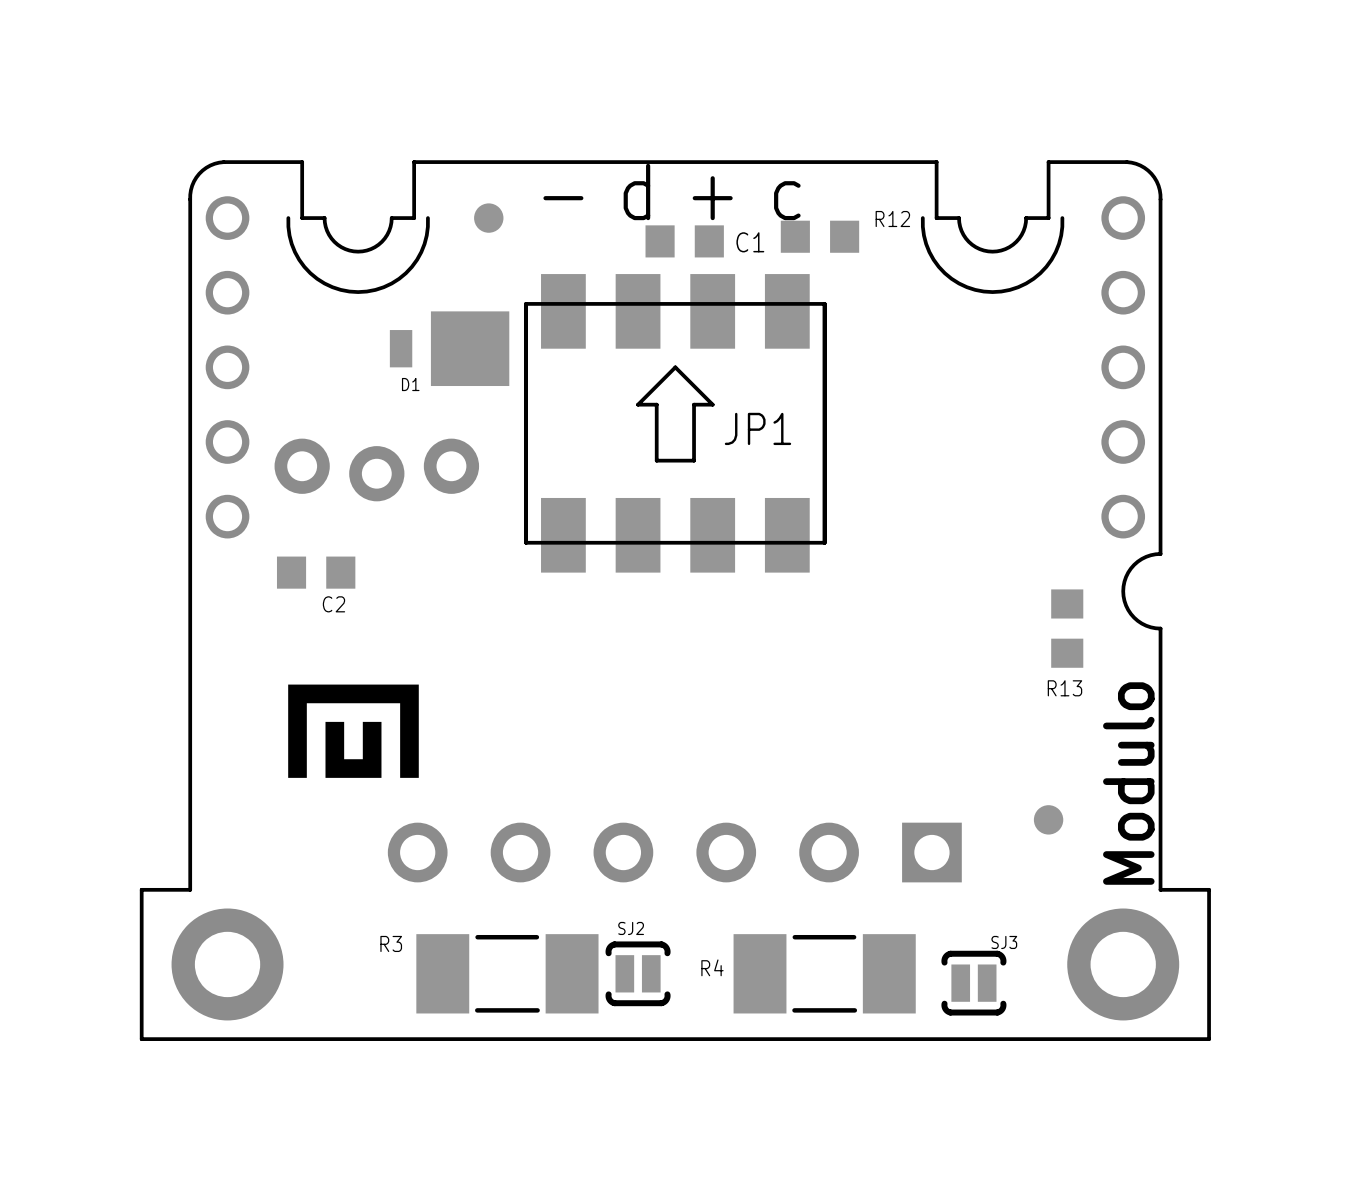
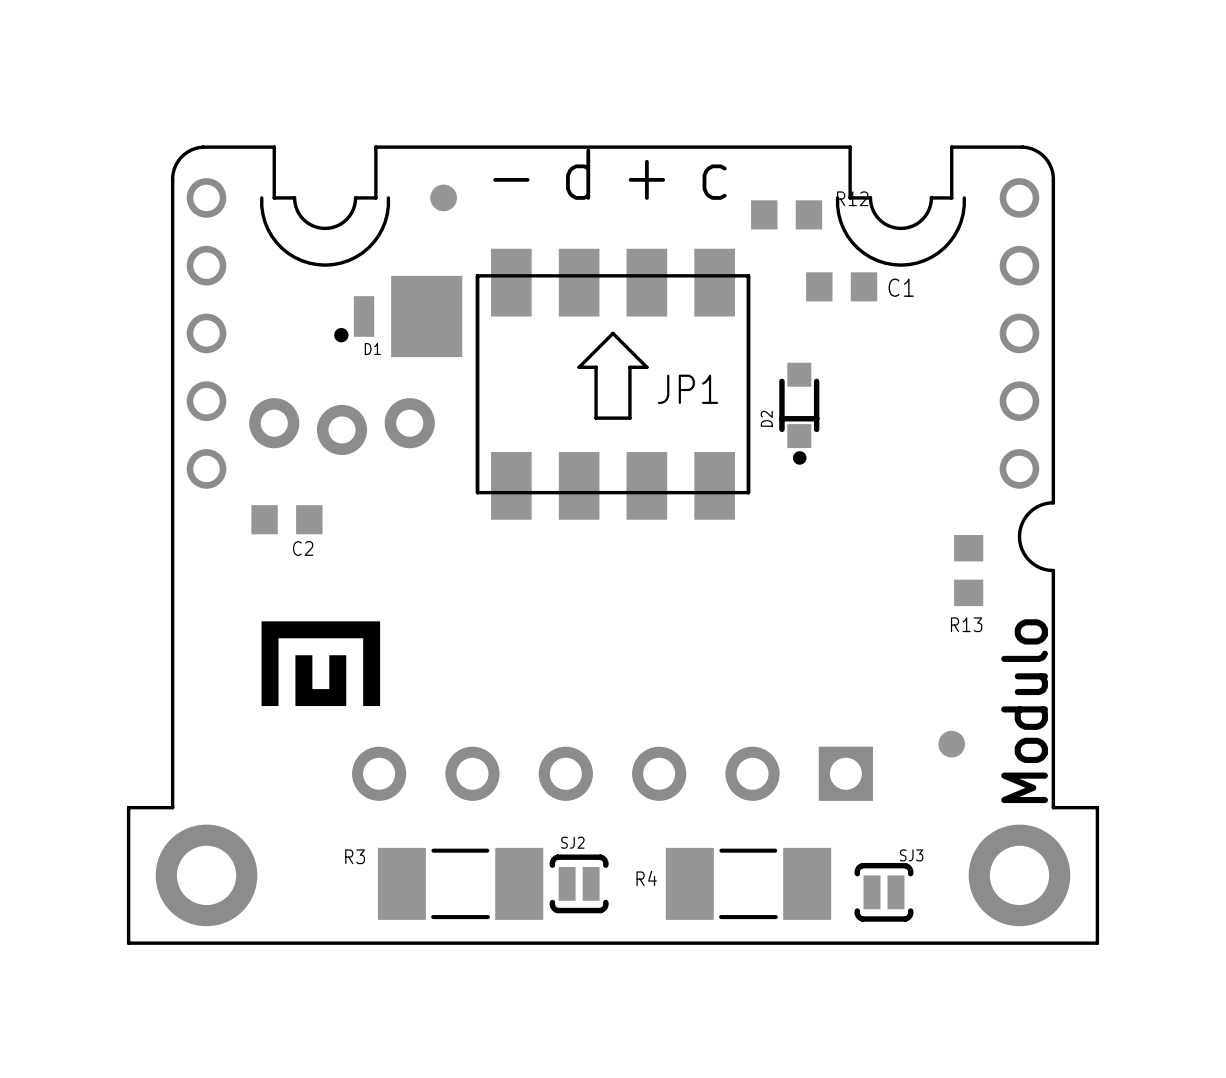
R12 position: (819, 236) -> (786, 214)
C1 position: (684, 241) -> (841, 286)
D1 footprint: [389, 311, 510, 387] -> [334, 275, 463, 358]
D2: none -> (799, 413)

